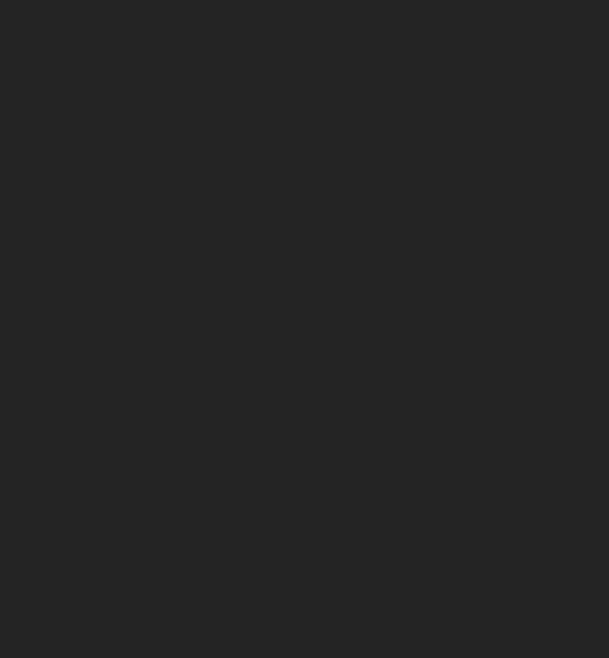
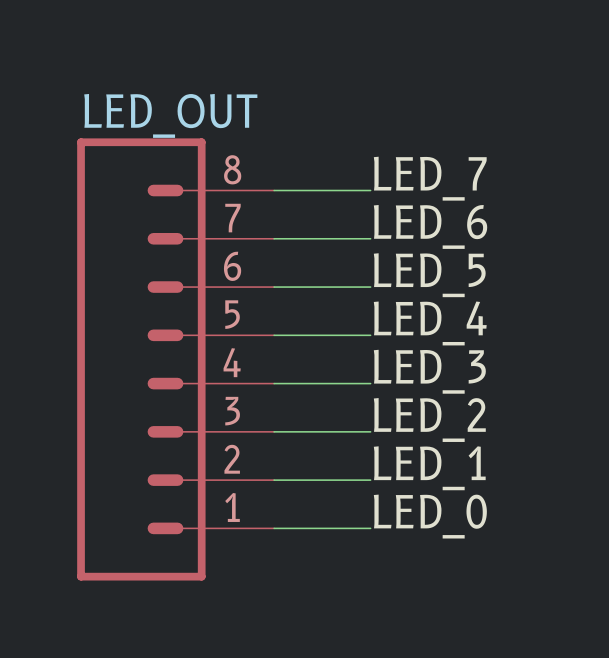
label: none -> LED_7 (430, 178)
wire: none -> (274, 190) (370, 190)
label: none -> LED_6 (430, 226)
wire: none -> (274, 238) (370, 238)
label: none -> LED_5 (429, 275)
wire: none -> (274, 287) (370, 287)
label: none -> LED_4 (430, 323)
wire: none -> (274, 335) (370, 335)
LED_OUT: none -> (175, 359)
label: none -> LED_3 (429, 371)
wire: none -> (274, 383) (370, 383)
label: none -> LED_2 (429, 420)
wire: none -> (274, 431) (370, 431)
label: none -> LED_1 (429, 468)
wire: none -> (274, 480) (370, 480)
label: none -> LED_0 (430, 516)
wire: none -> (274, 528) (370, 528)

